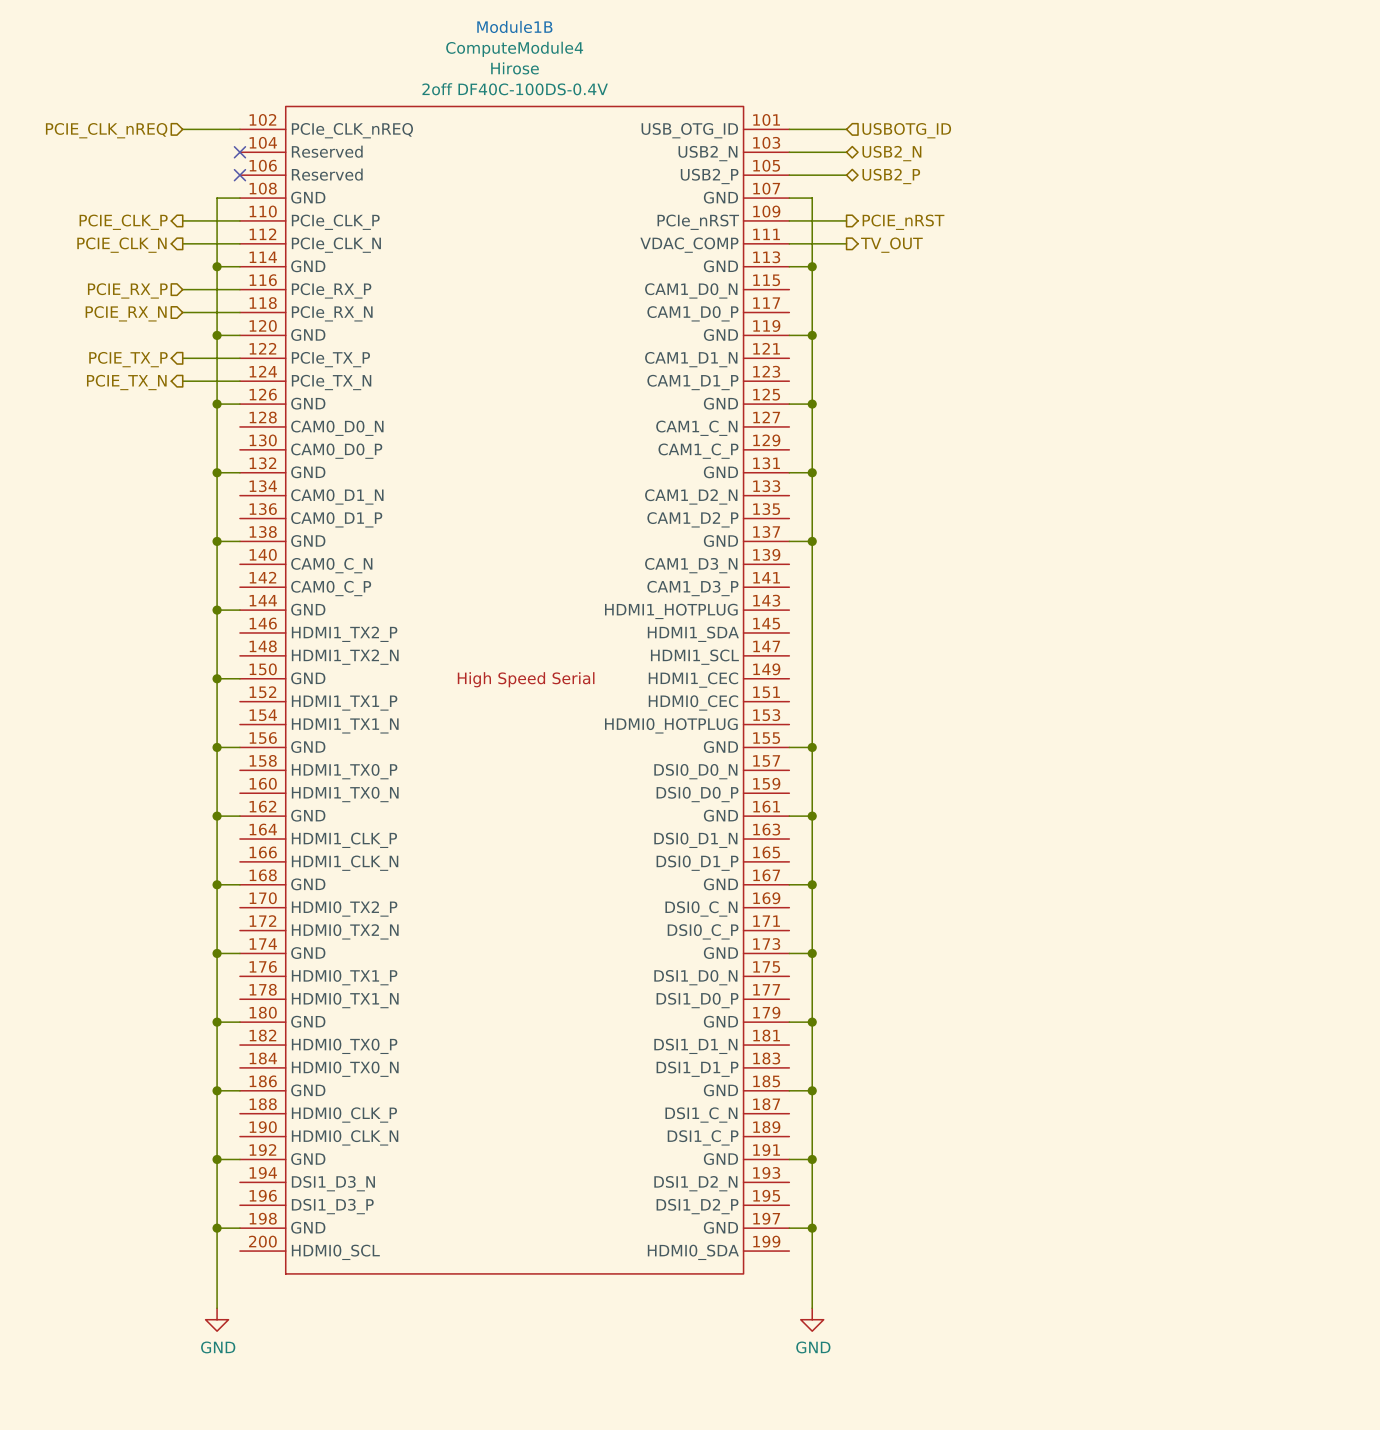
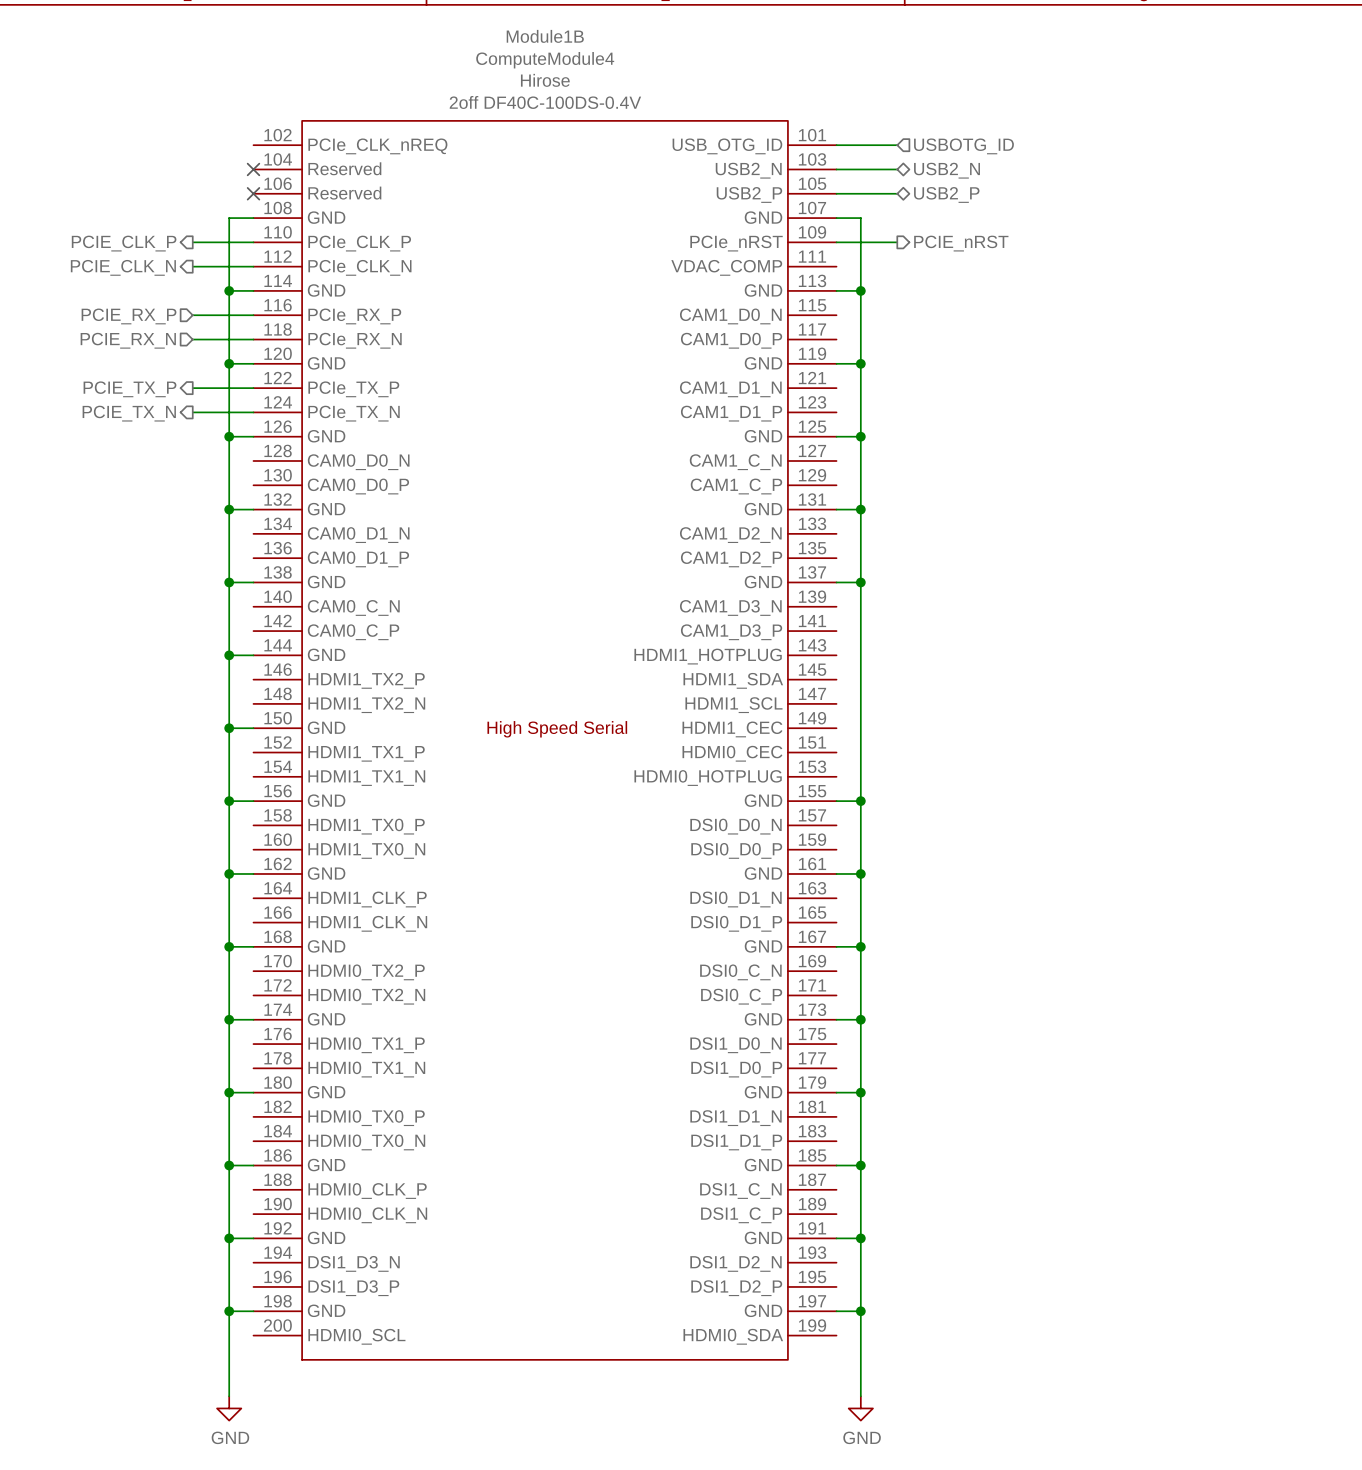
wire: (182, 129) (239, 129) -> none
hierarchical label: PCIE_CLK_nREQ (106, 130) -> none
wire: (789, 243) (846, 243) -> none
hierarchical label: TV_OUT (891, 245) -> none

